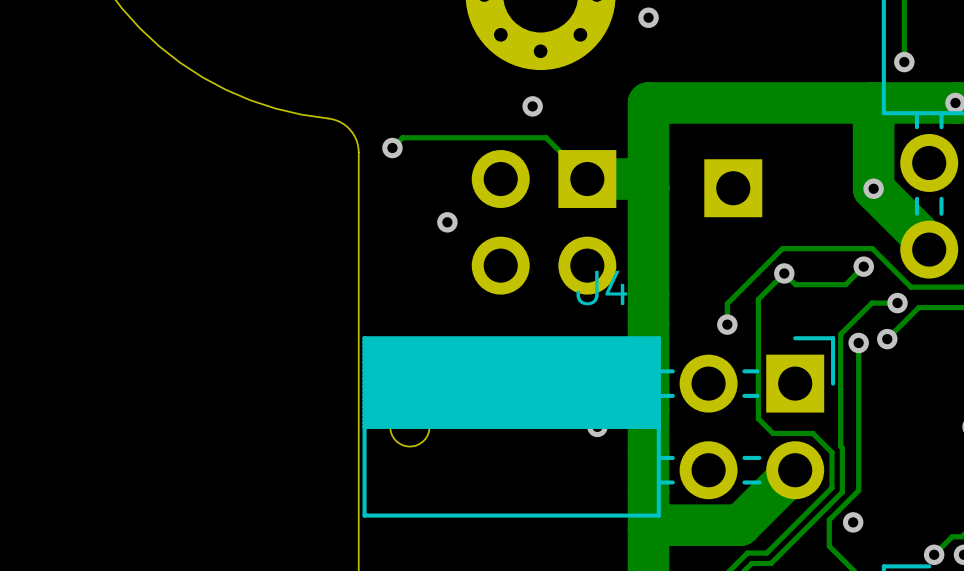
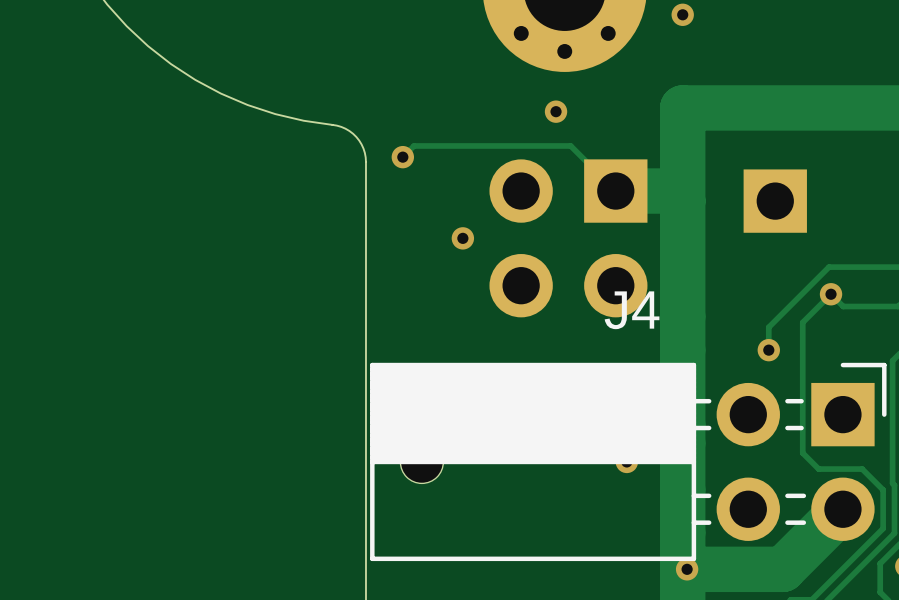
via: none -> (687, 569)

